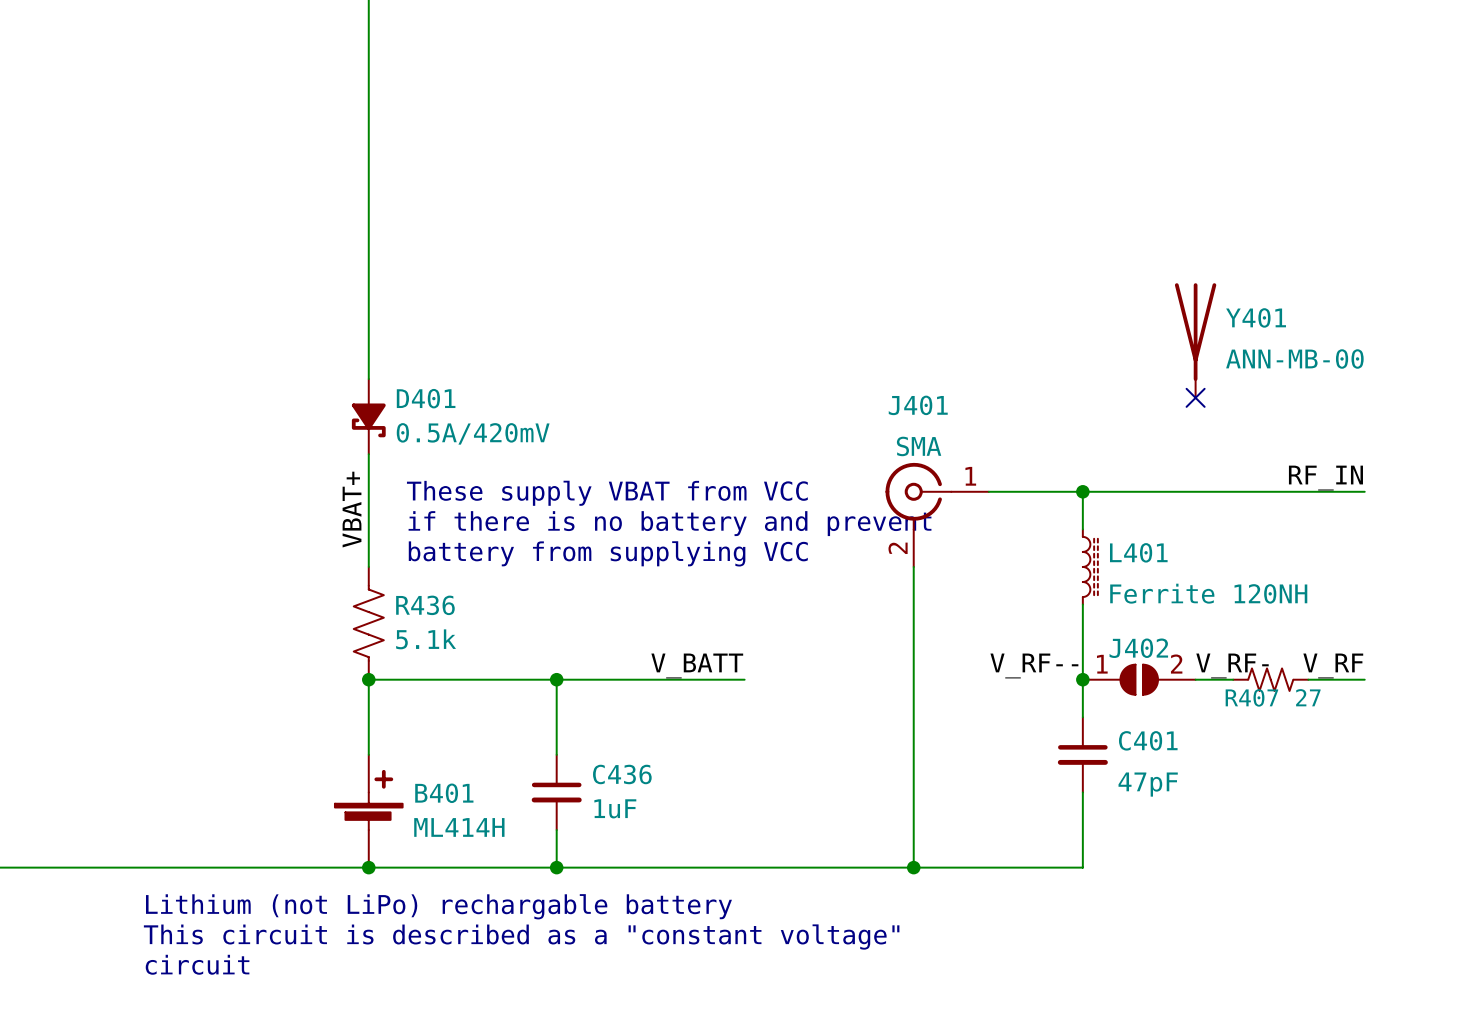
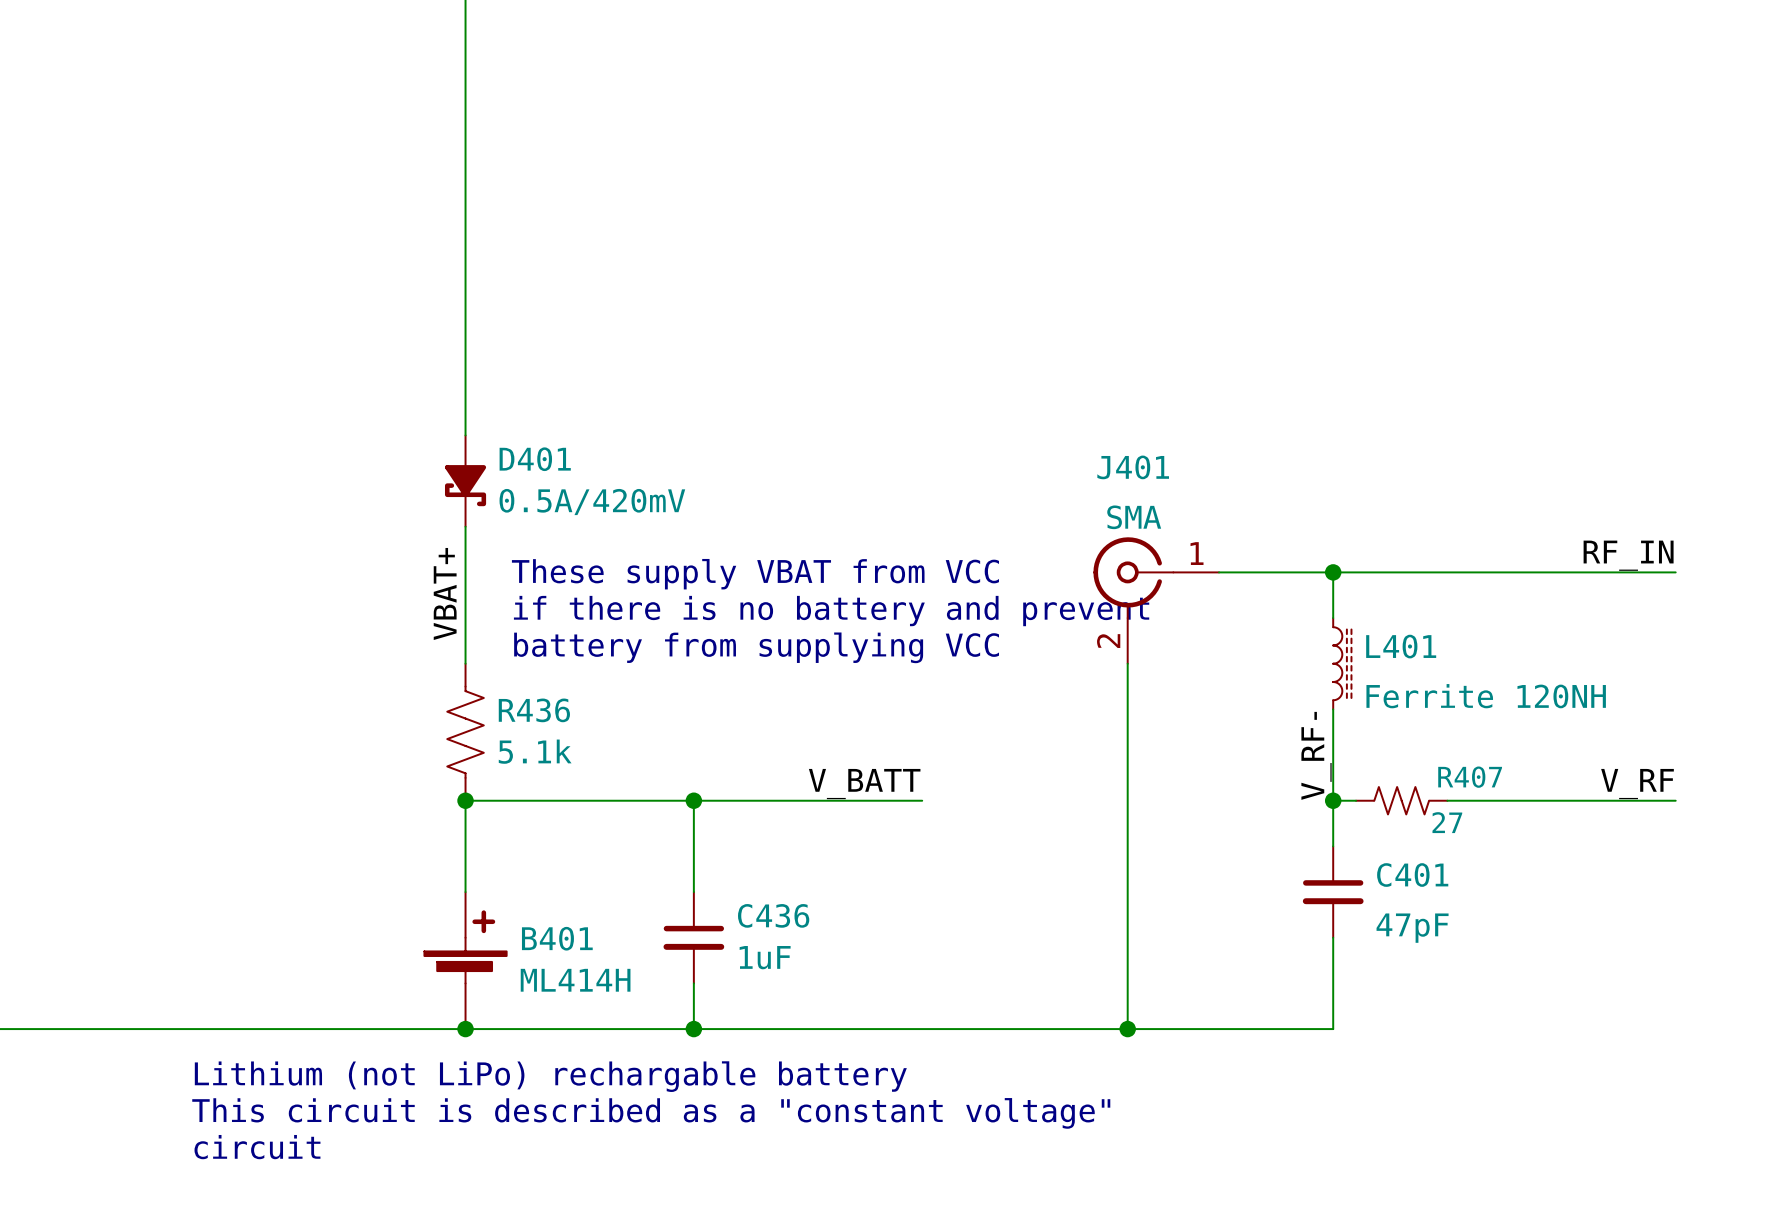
Y401: ANN-MB-00 (1195, 340) -> none
no-connect mark: (1195, 397) -> none
label: V_RF-- (1034, 665) -> V_RF- (1316, 755)
label: V_RF- (1232, 665) -> none
J402: (1139, 679) -> none
R407 position: (1270, 679) -> (1401, 800)
R407 name position: R407 (1251, 697) -> R407 (1470, 777)

